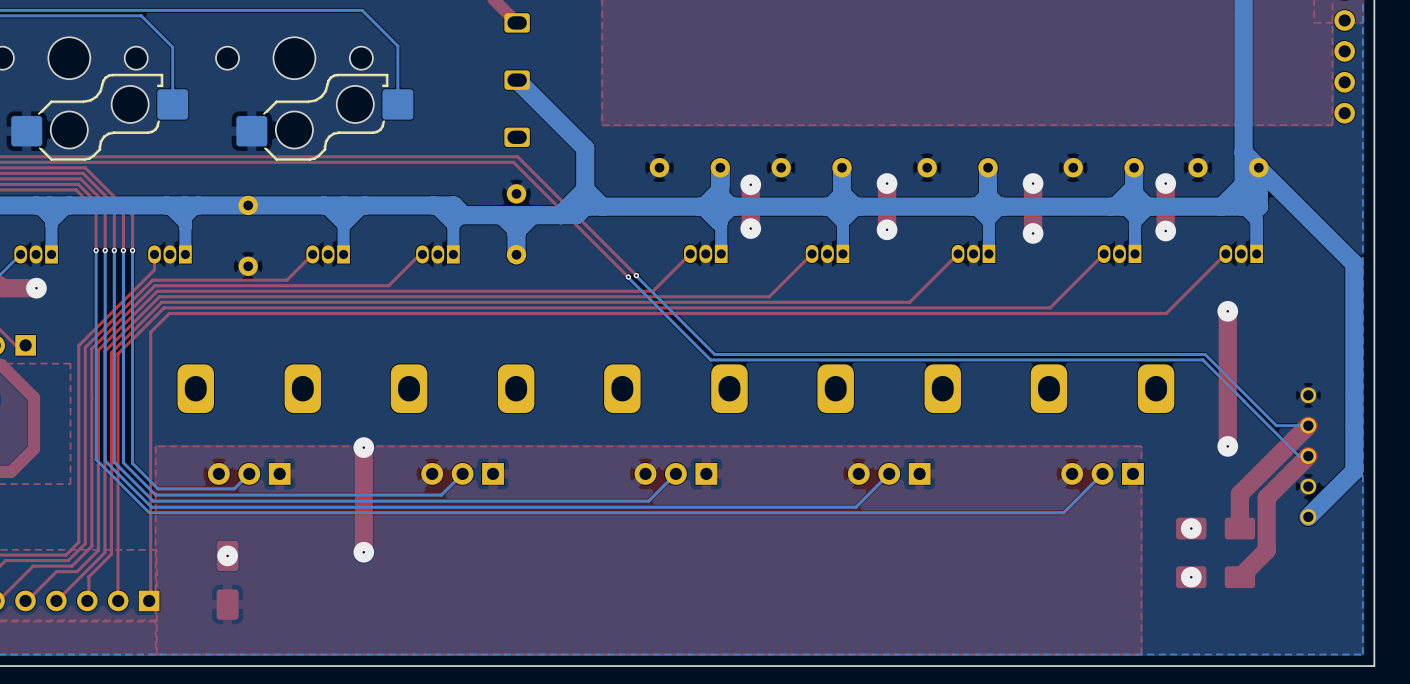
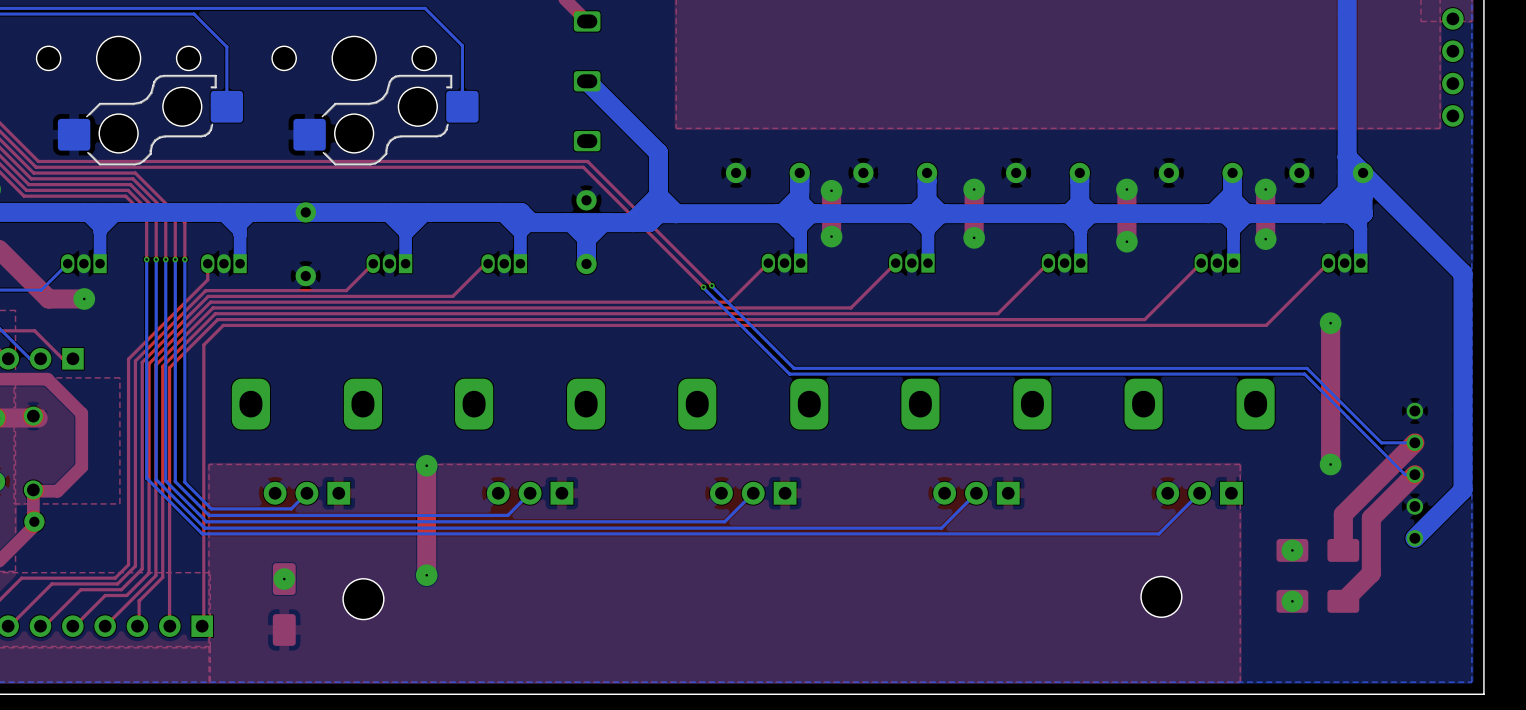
part: none -> (1161, 596)
part: none -> (363, 599)

